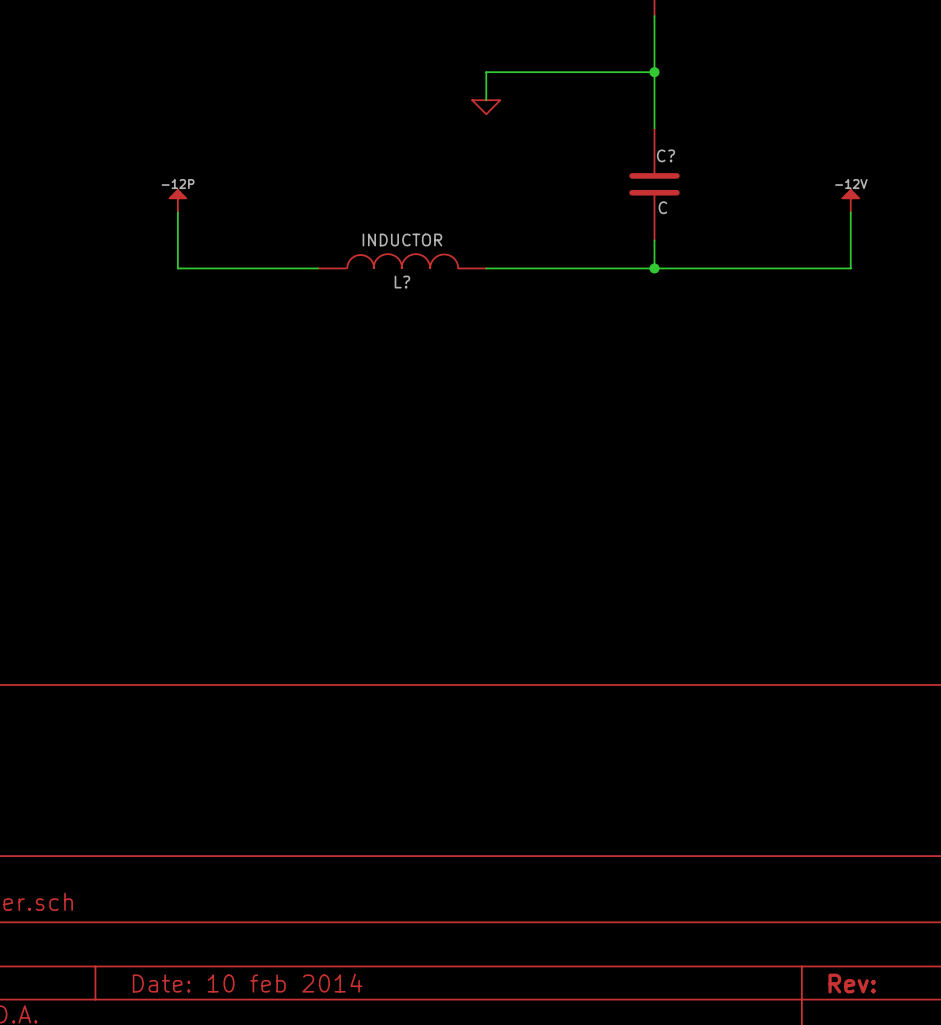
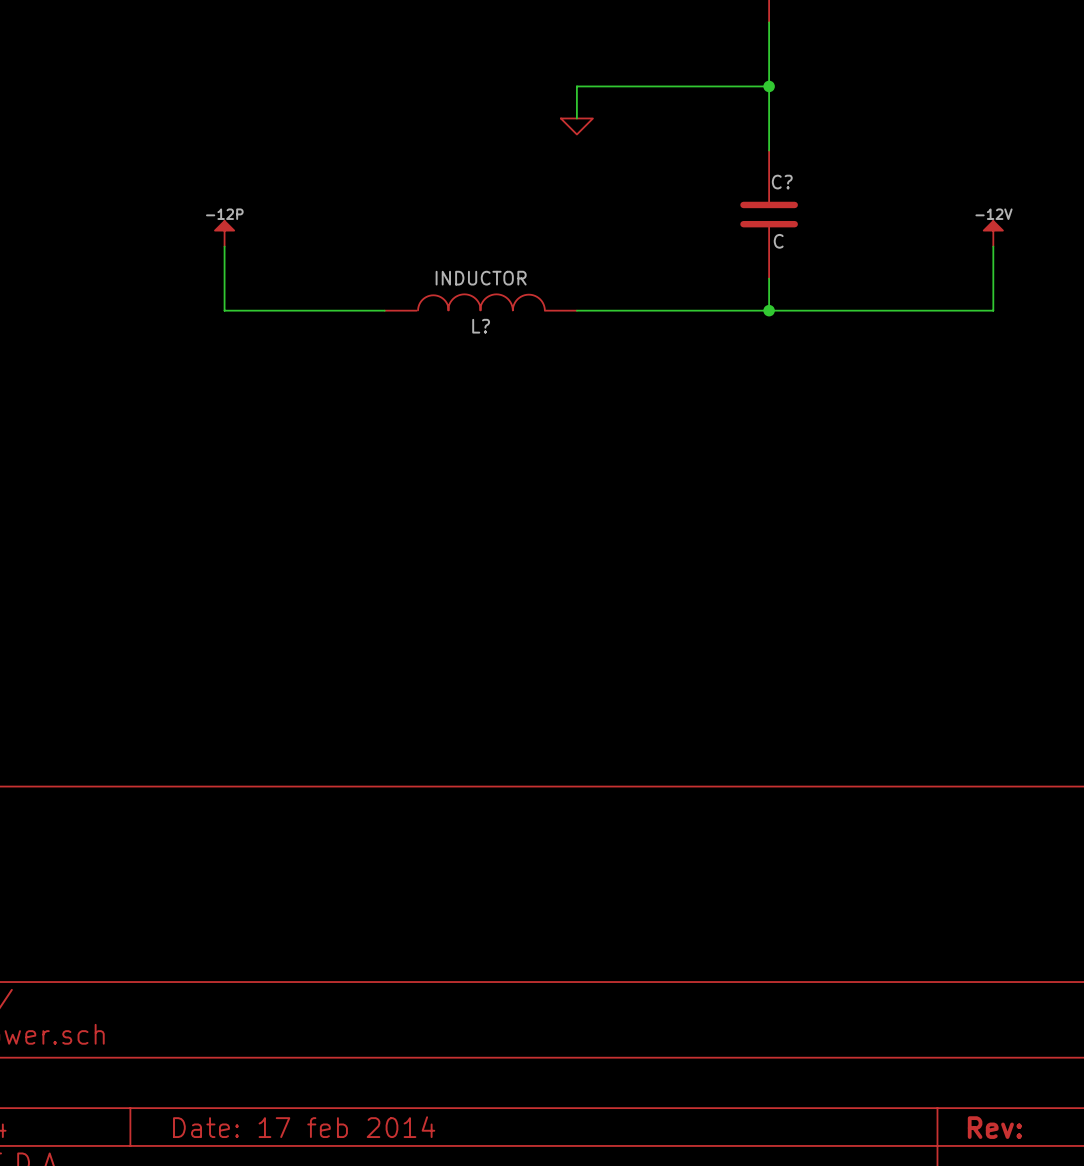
title block: Date: 10 feb 2014 (247, 983) -> Date: 17 feb 2014 (304, 1127)

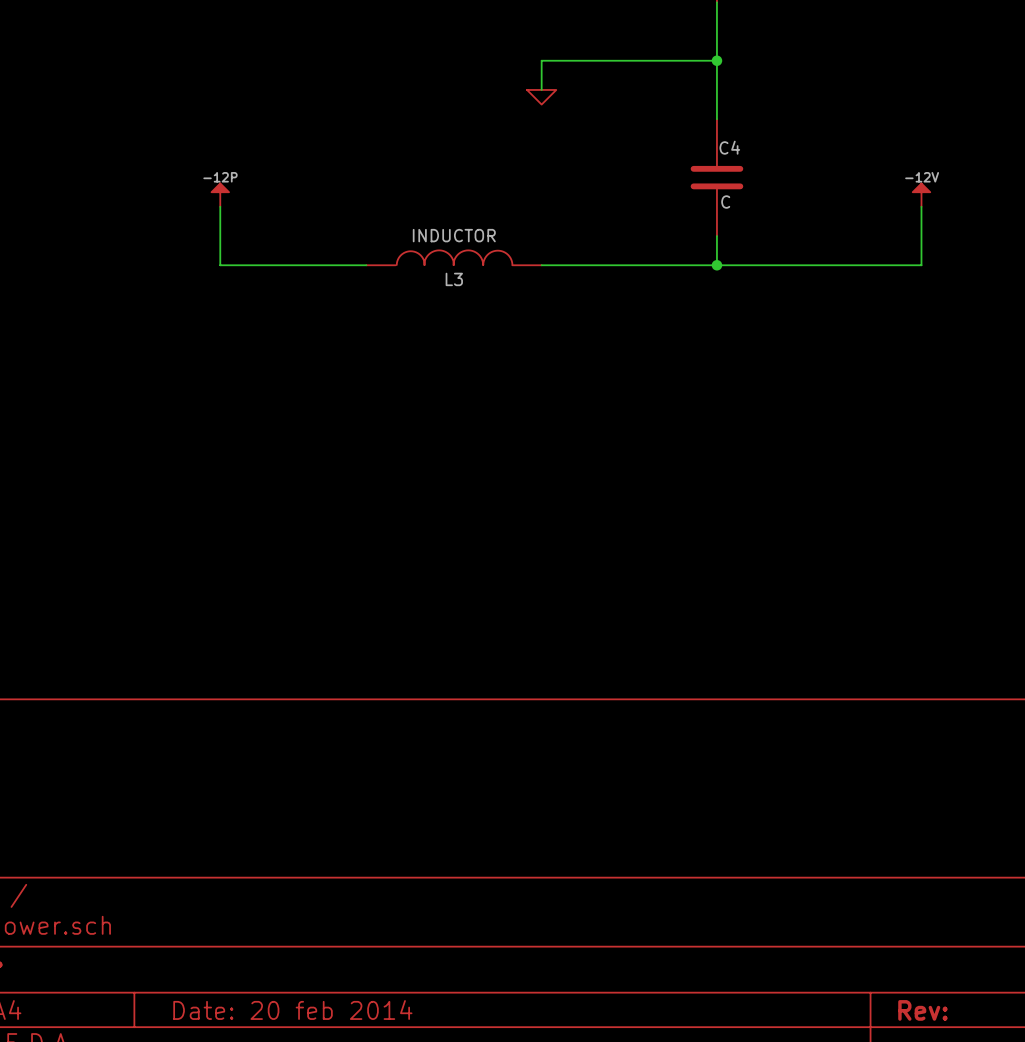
C? name: C? (782, 182) -> C4 (729, 147)
L? name: L? (481, 326) -> L3 (454, 279)
title block: Date: 17 feb 2014 (304, 1127) -> Date: 20 feb 2014 (292, 1010)

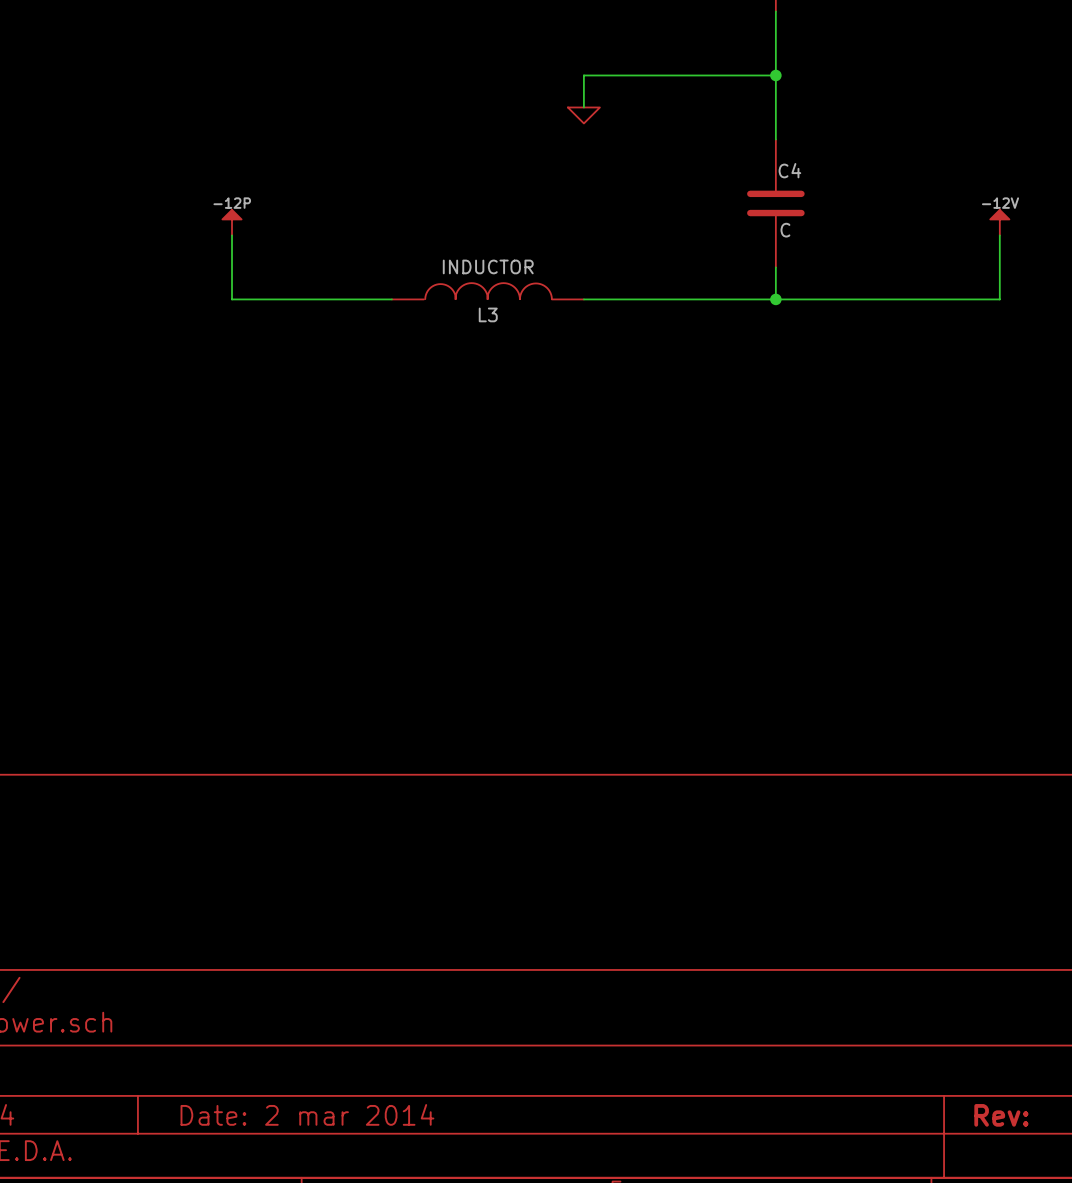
title block: Date: 20 feb 2014 (292, 1010) -> Date: 2 mar 2014 (307, 1114)

